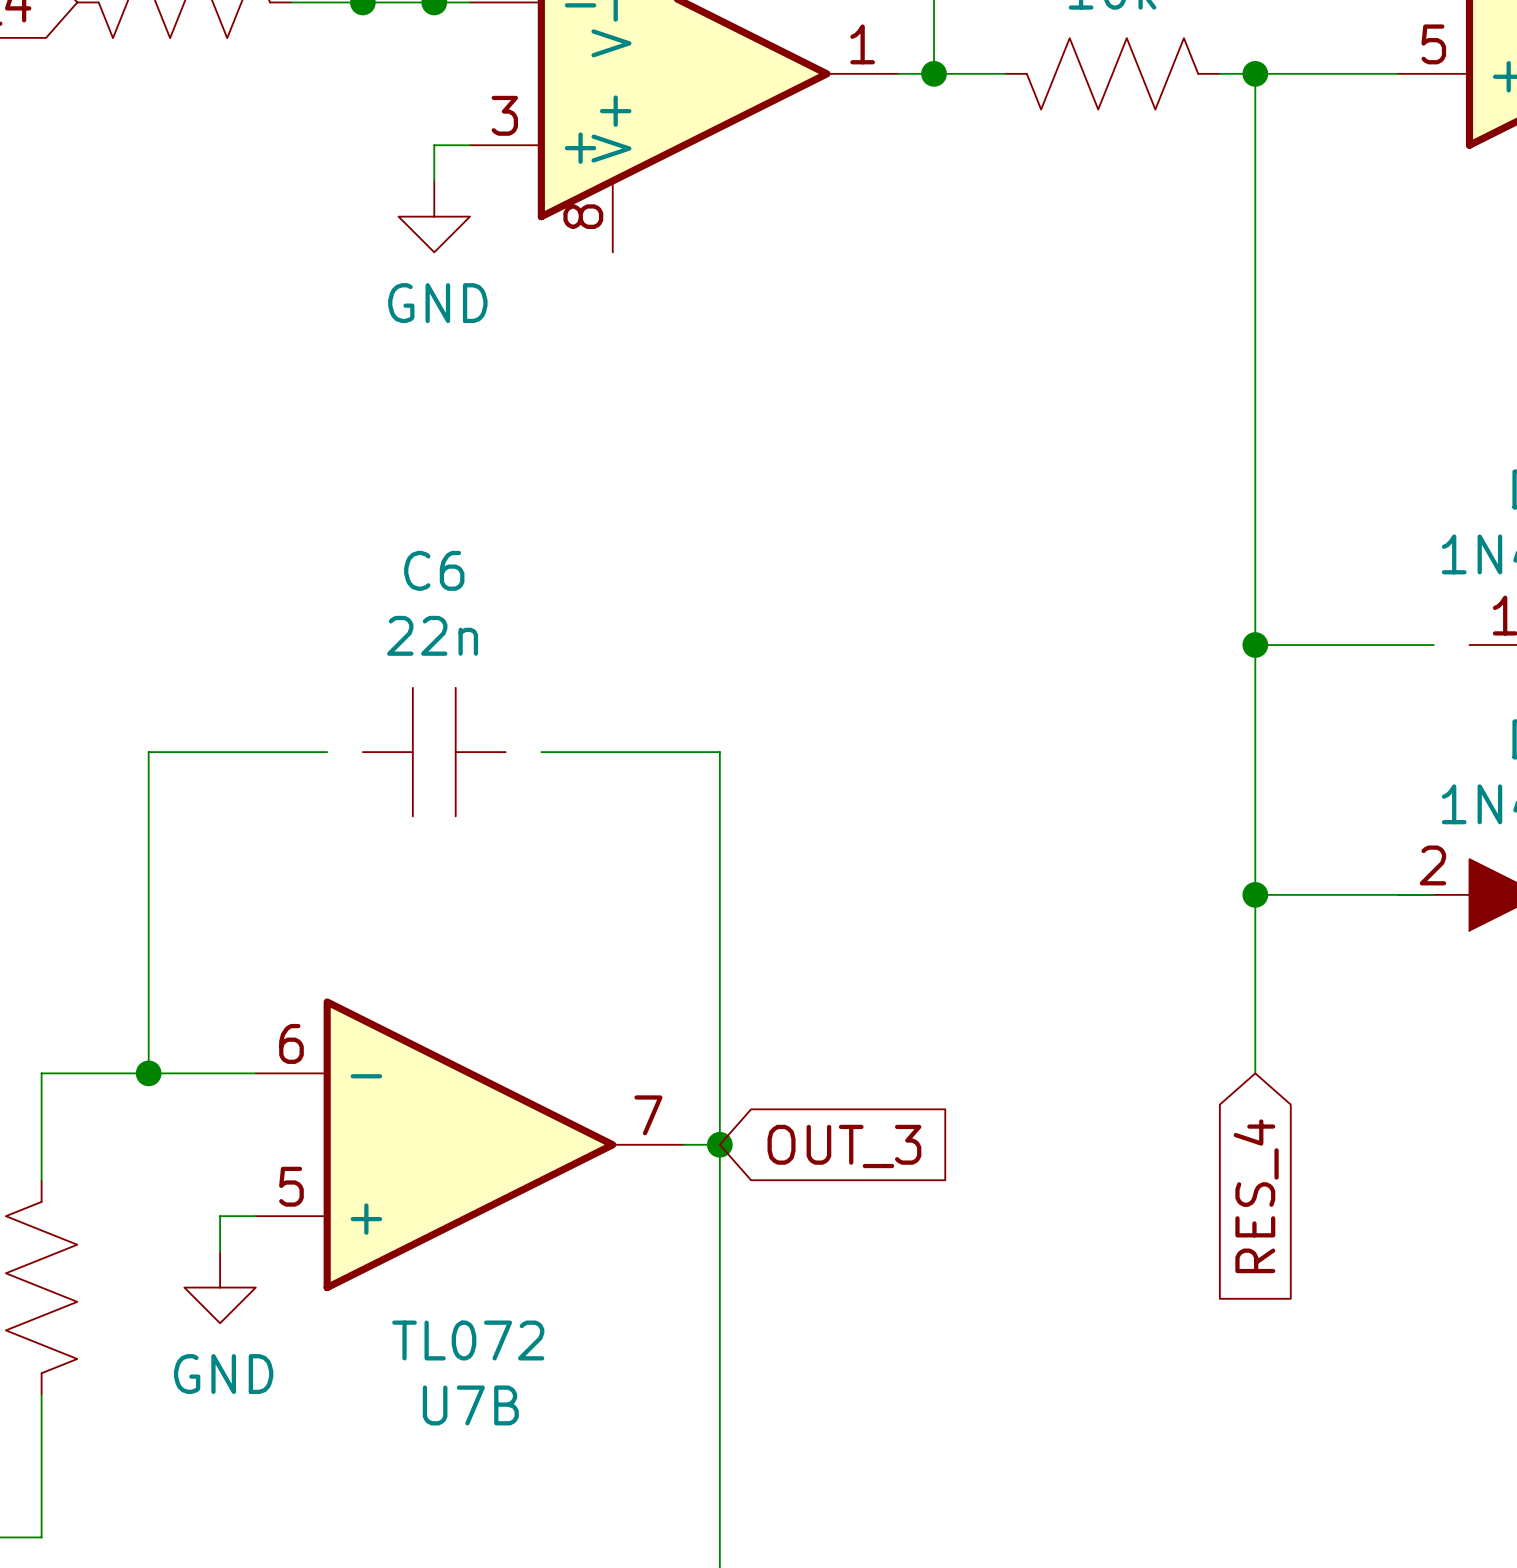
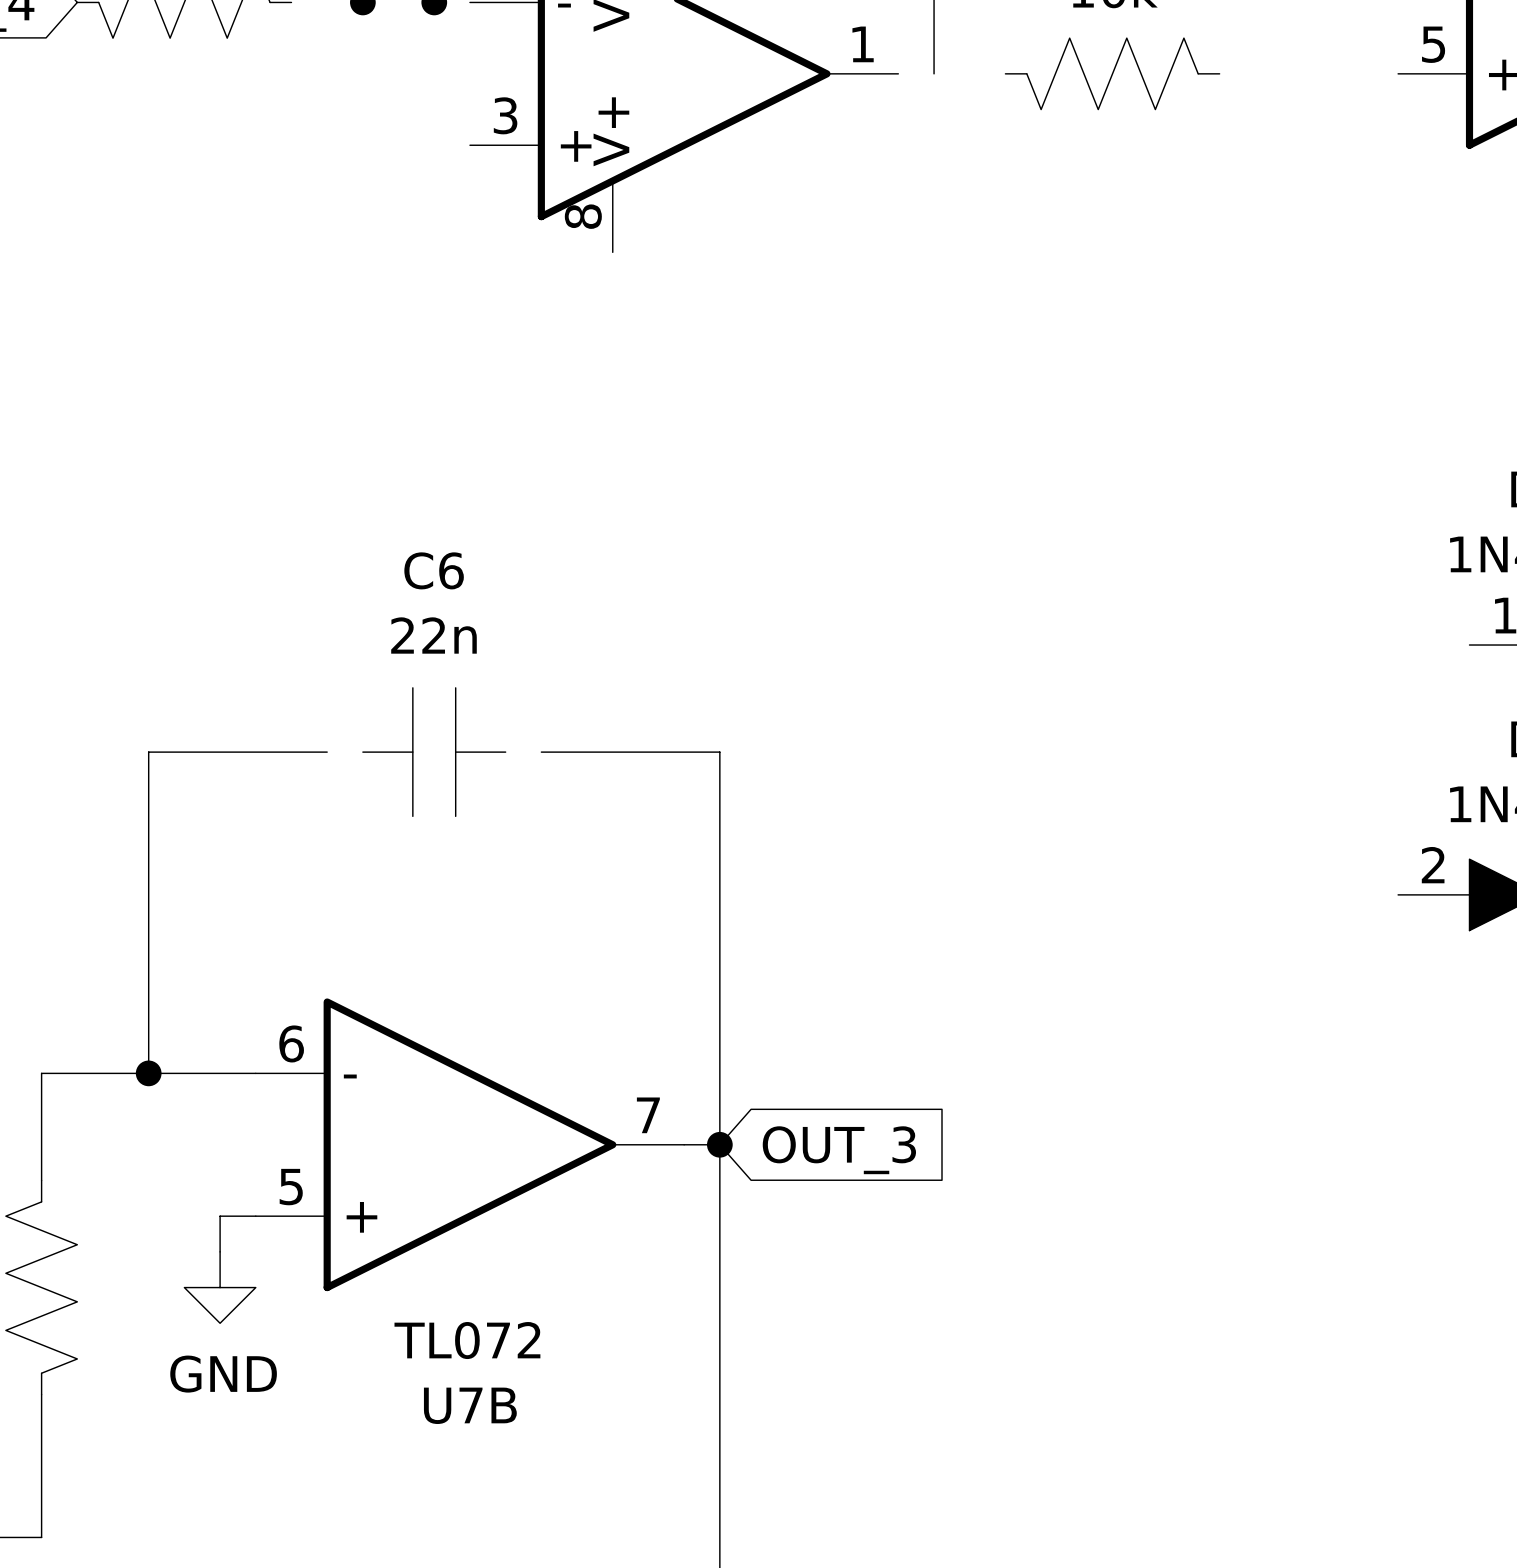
wire: (291, 2) (469, 2) -> none
wire: (898, 73) (1005, 73) -> none
junction: (934, 73) -> none
wire: (1219, 73) (1398, 73) -> none
wire: (1255, 73) (1255, 1073) -> none
junction: (1255, 73) -> none
wire: (469, 145) (434, 145) (434, 180) -> none
power symbol: GND (434, 216) -> none
wire: (1255, 645) (1433, 645) -> none
junction: (1255, 645) -> none
wire: (1255, 894) (1433, 894) -> none
junction: (1255, 894) -> none
global label: RES_4 (1256, 1196) -> none

